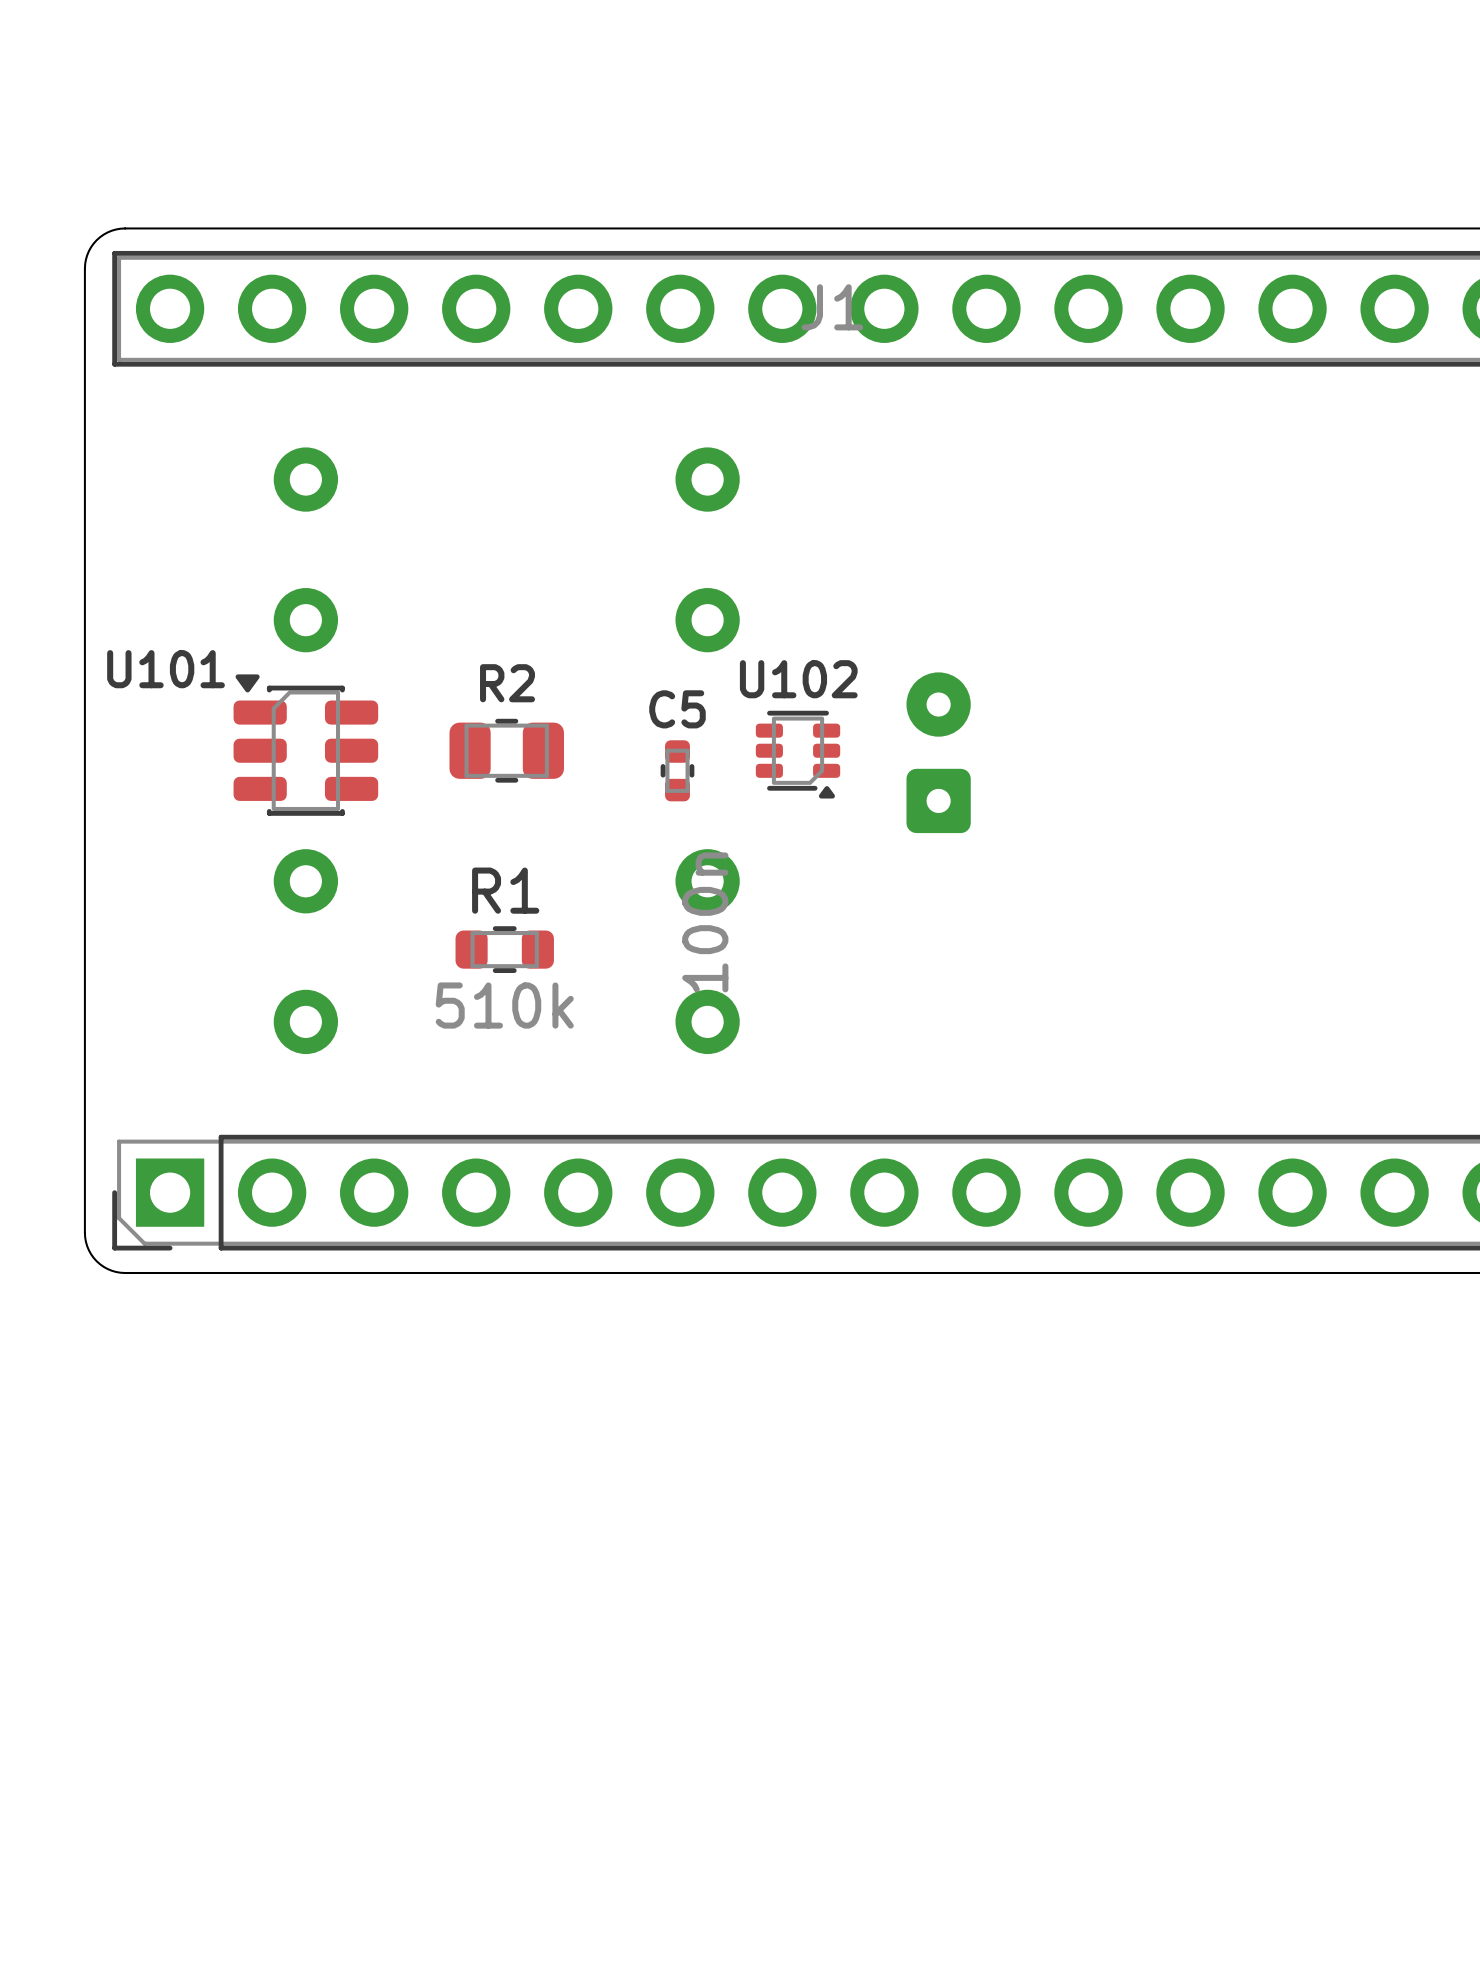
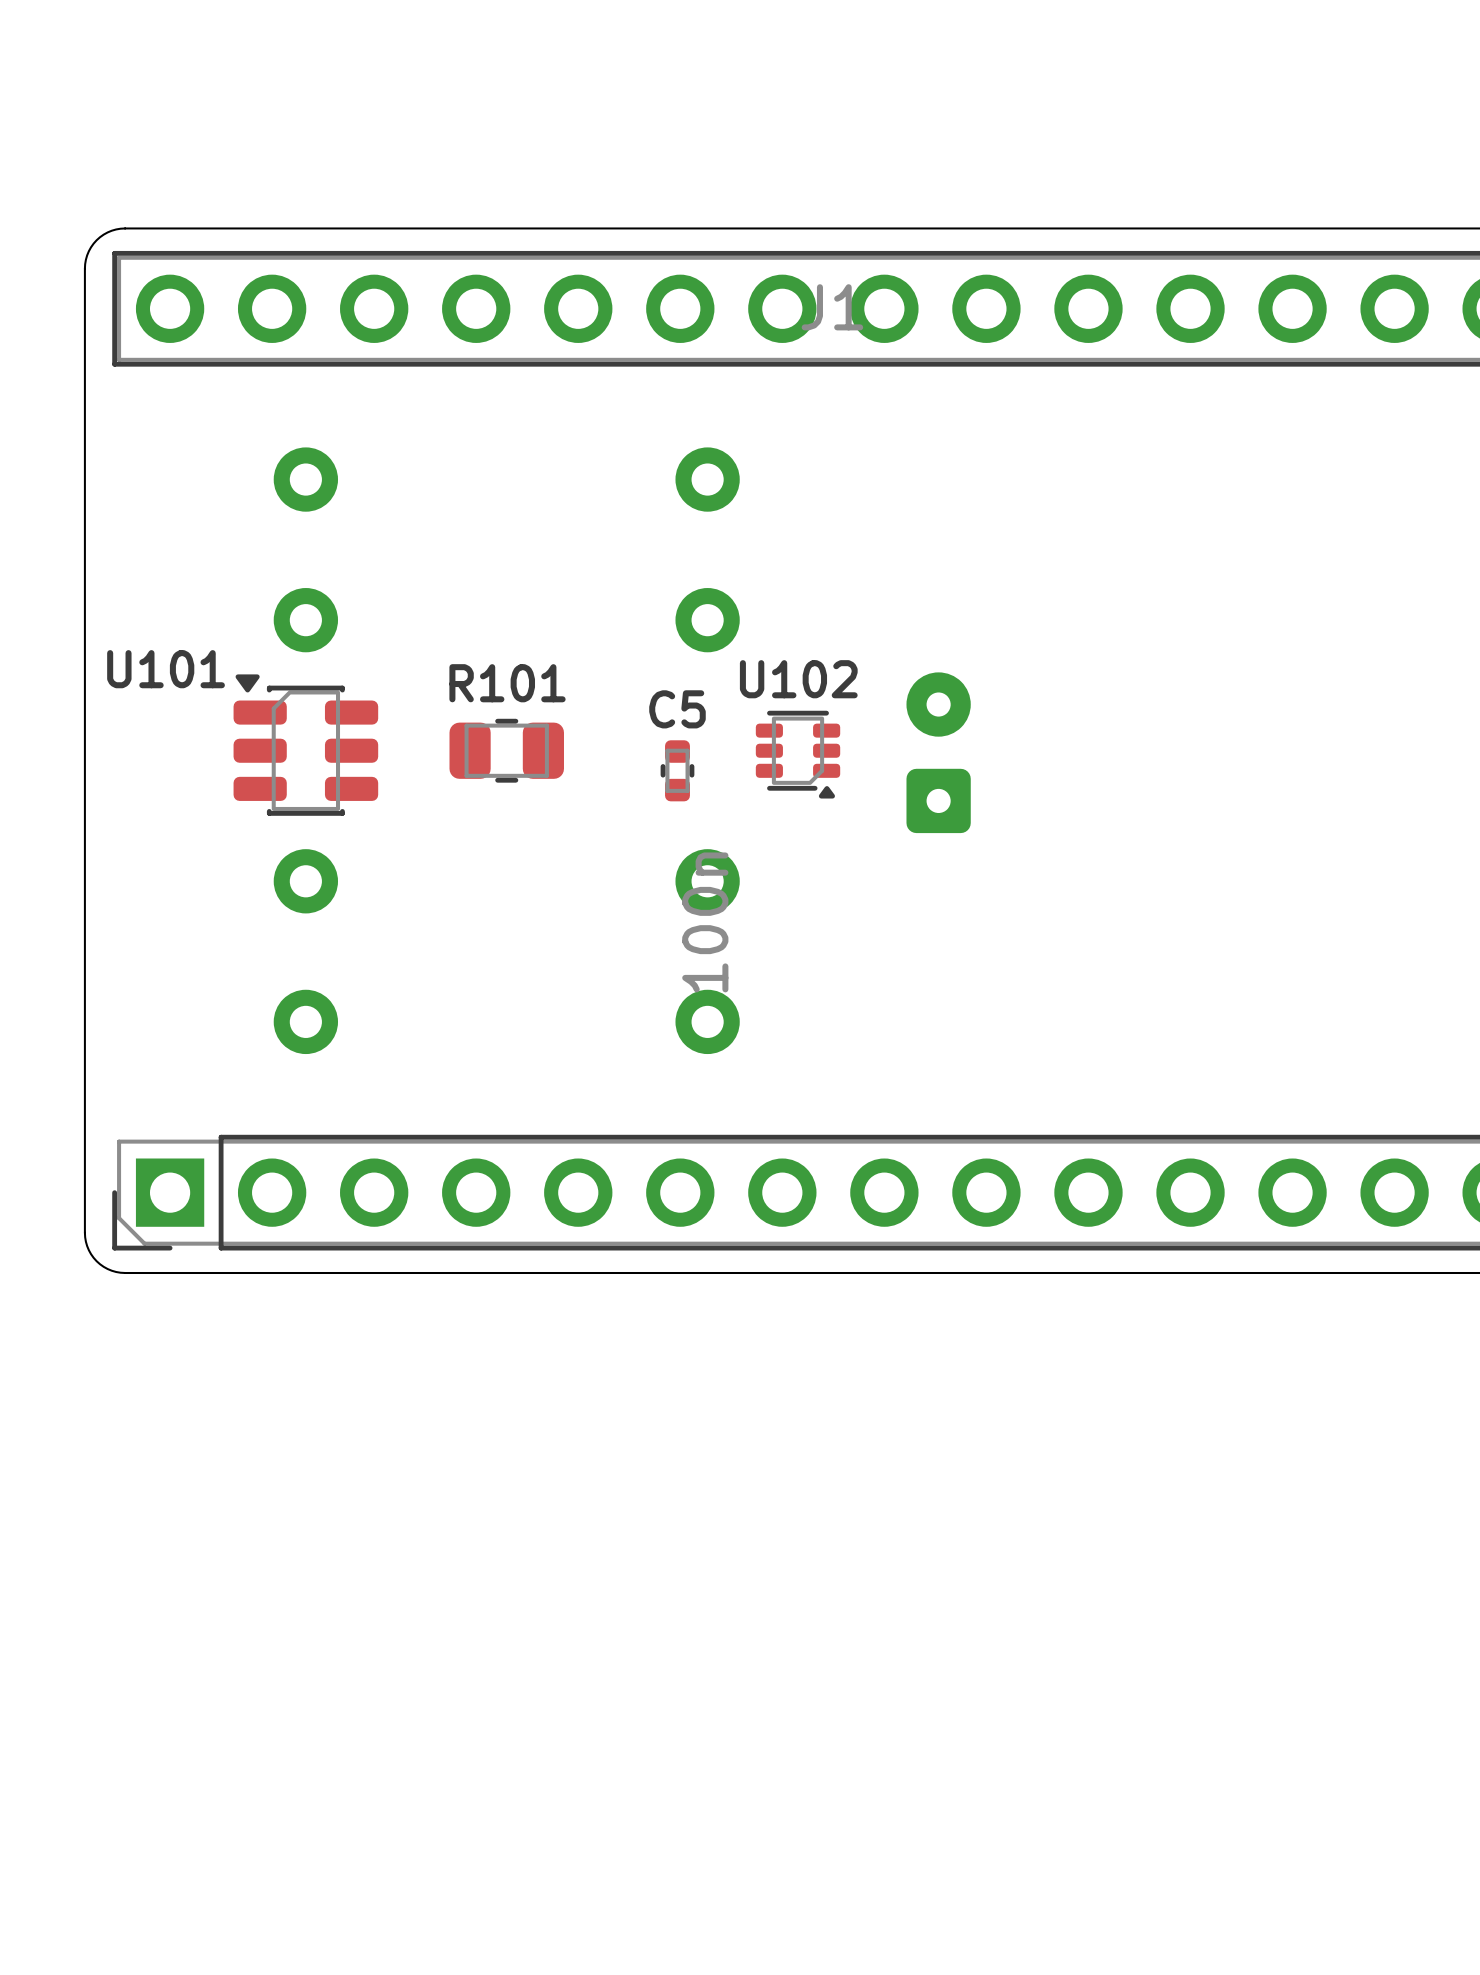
R2 name: R2 (507, 683) -> R101 (507, 683)
R1: 510k (504, 949) -> none

